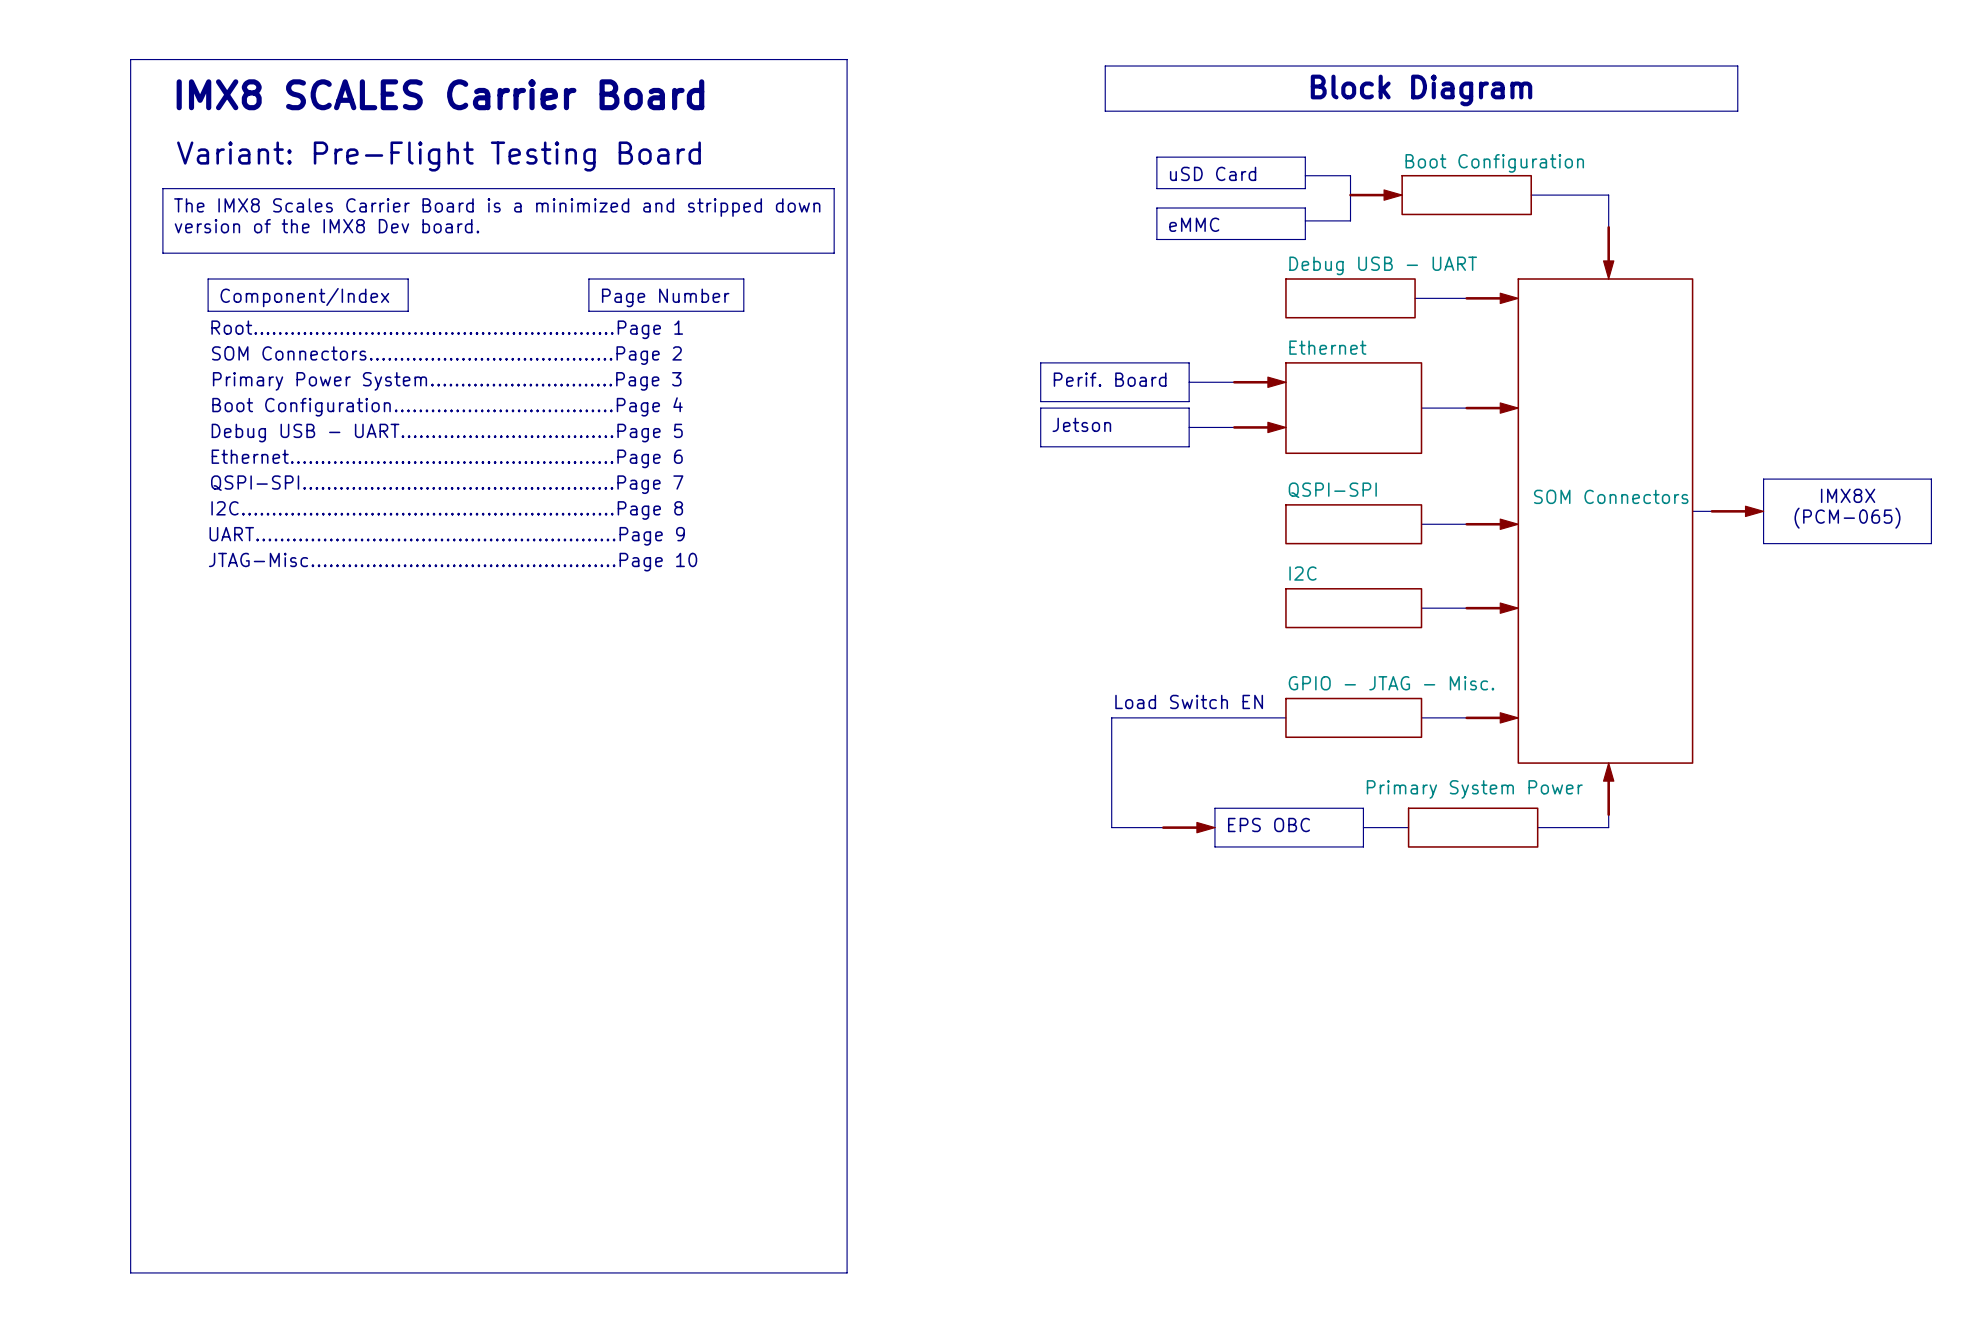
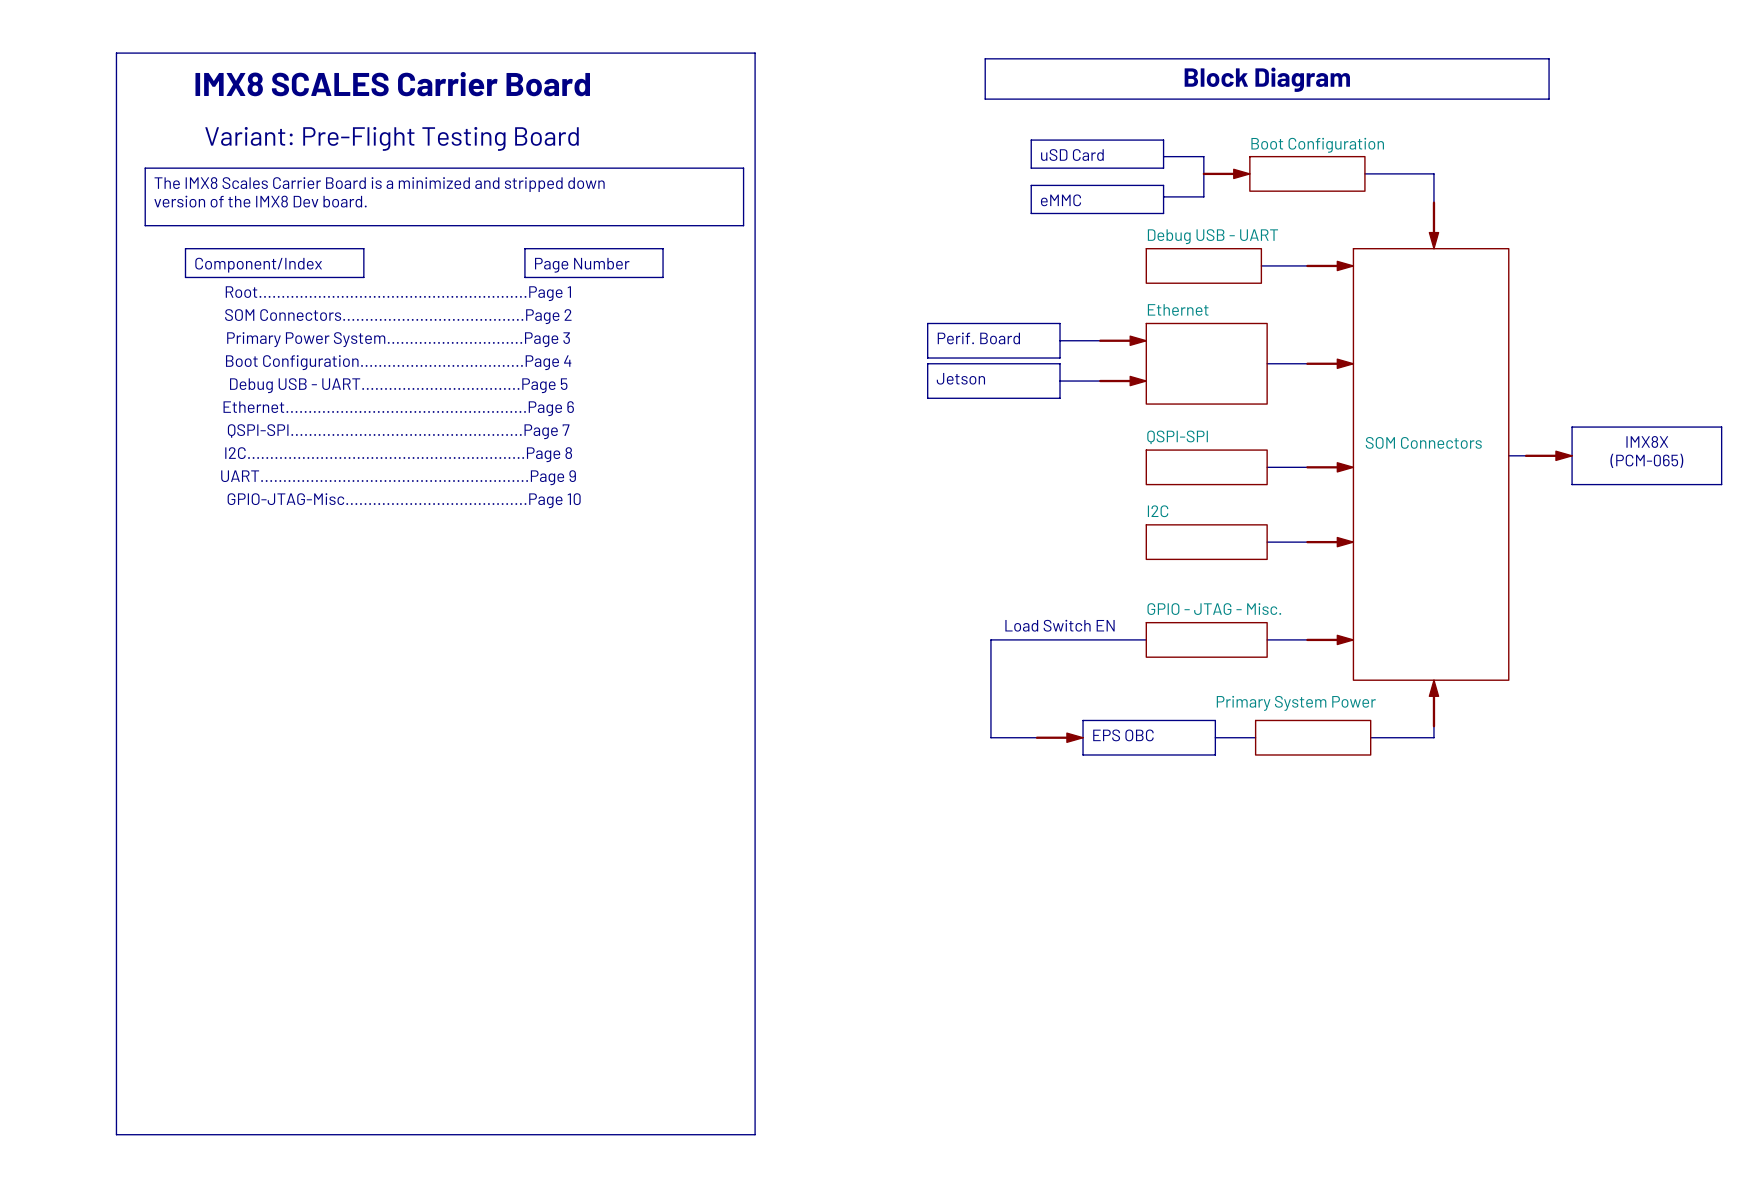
text: JTAG-Misc..................................................Page 10 (453, 562) -> GPIO-JTAG-Misc........................................Page 10 (404, 500)

